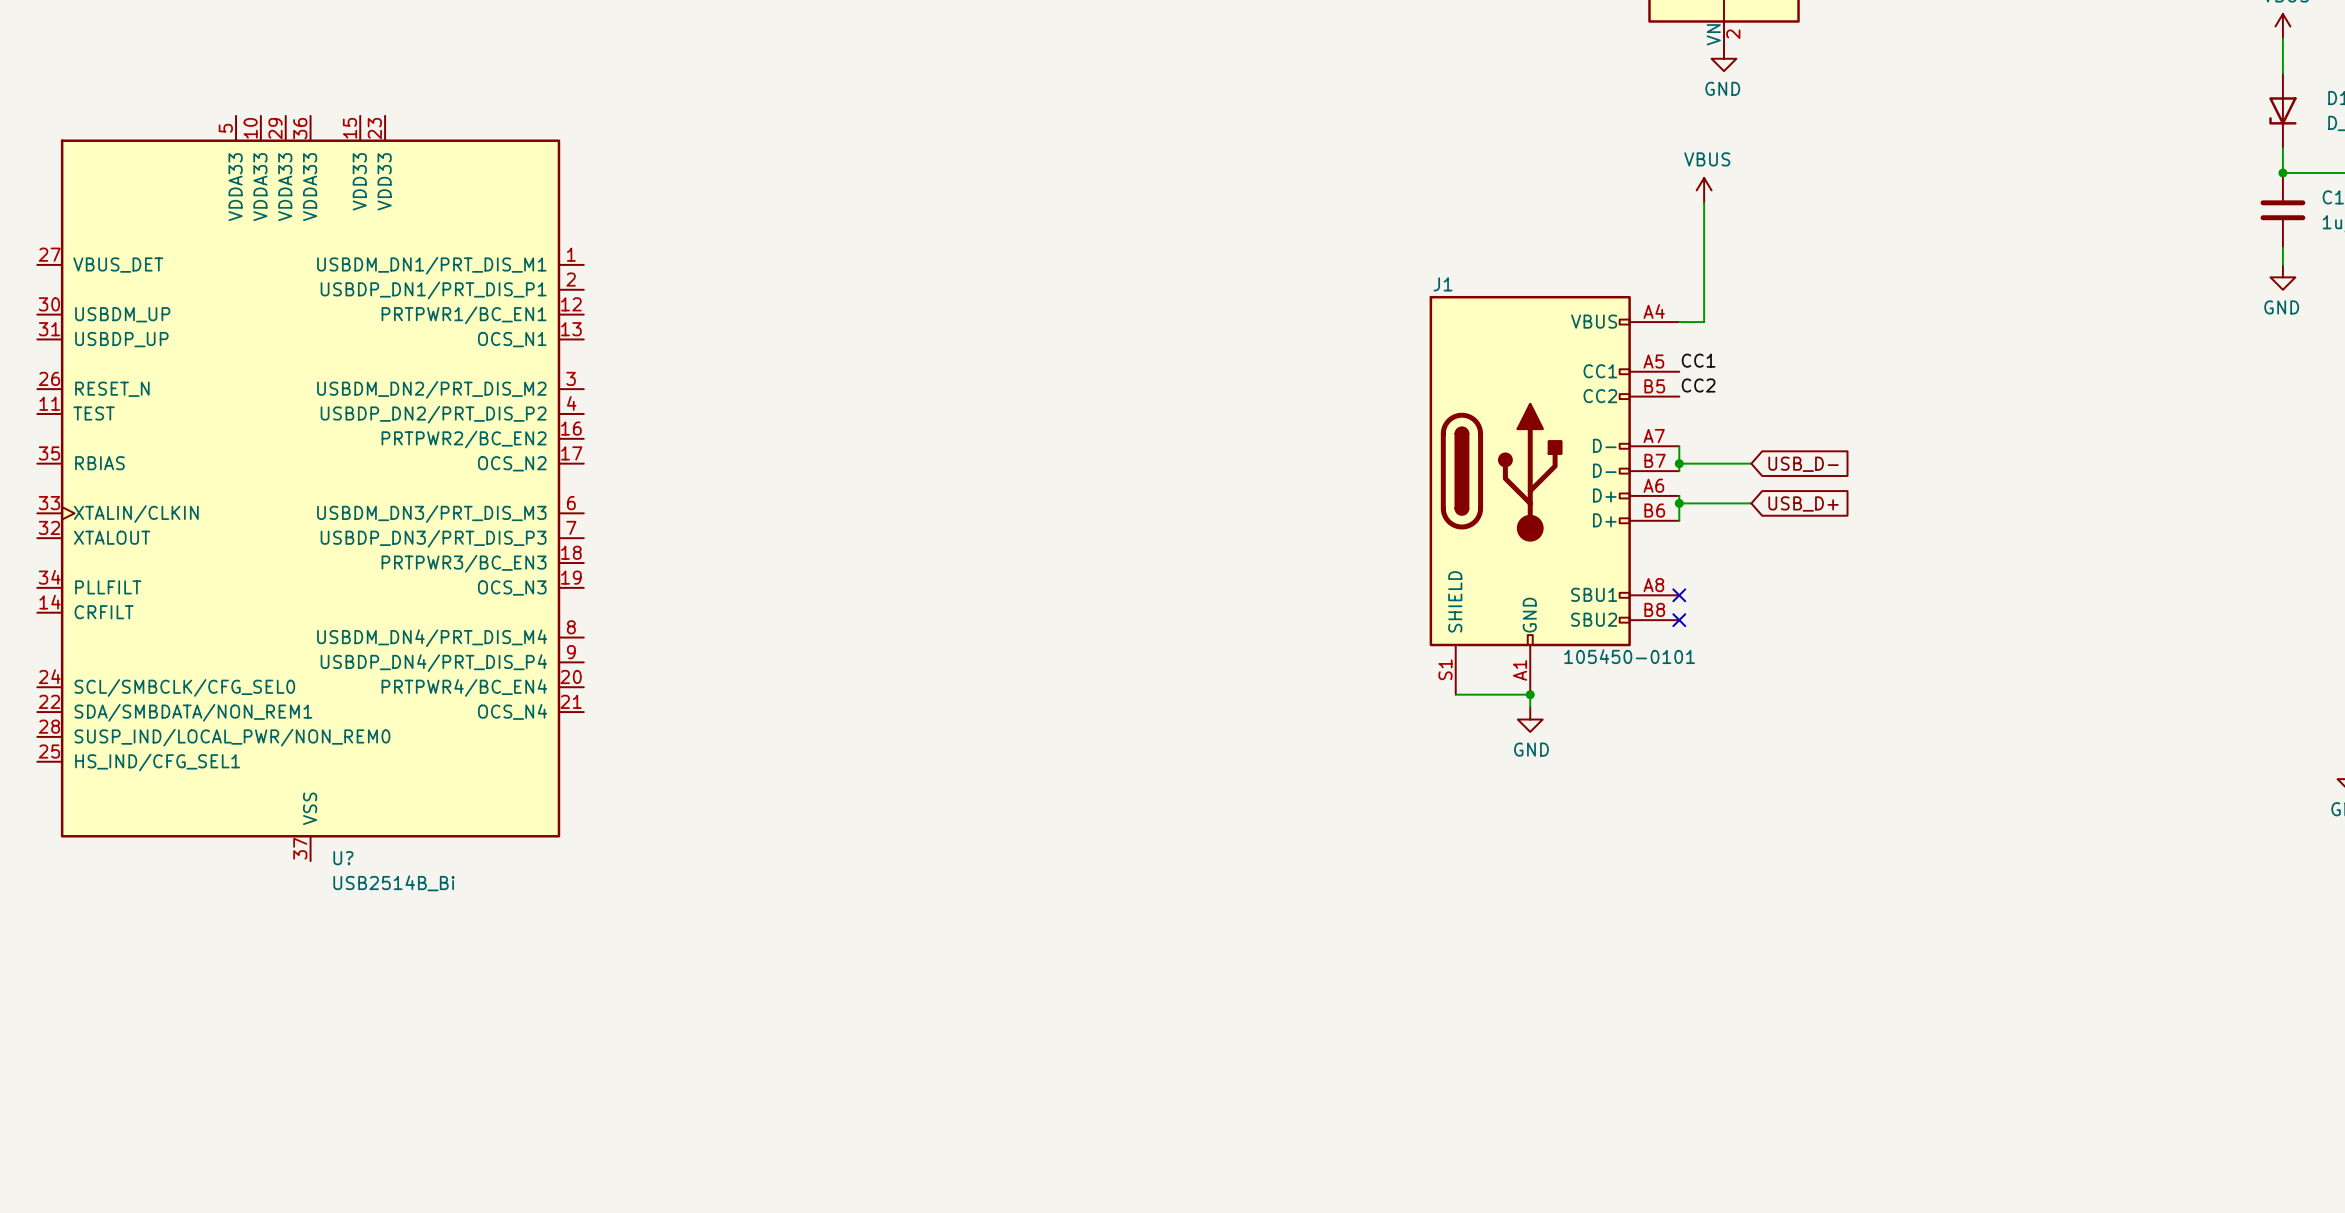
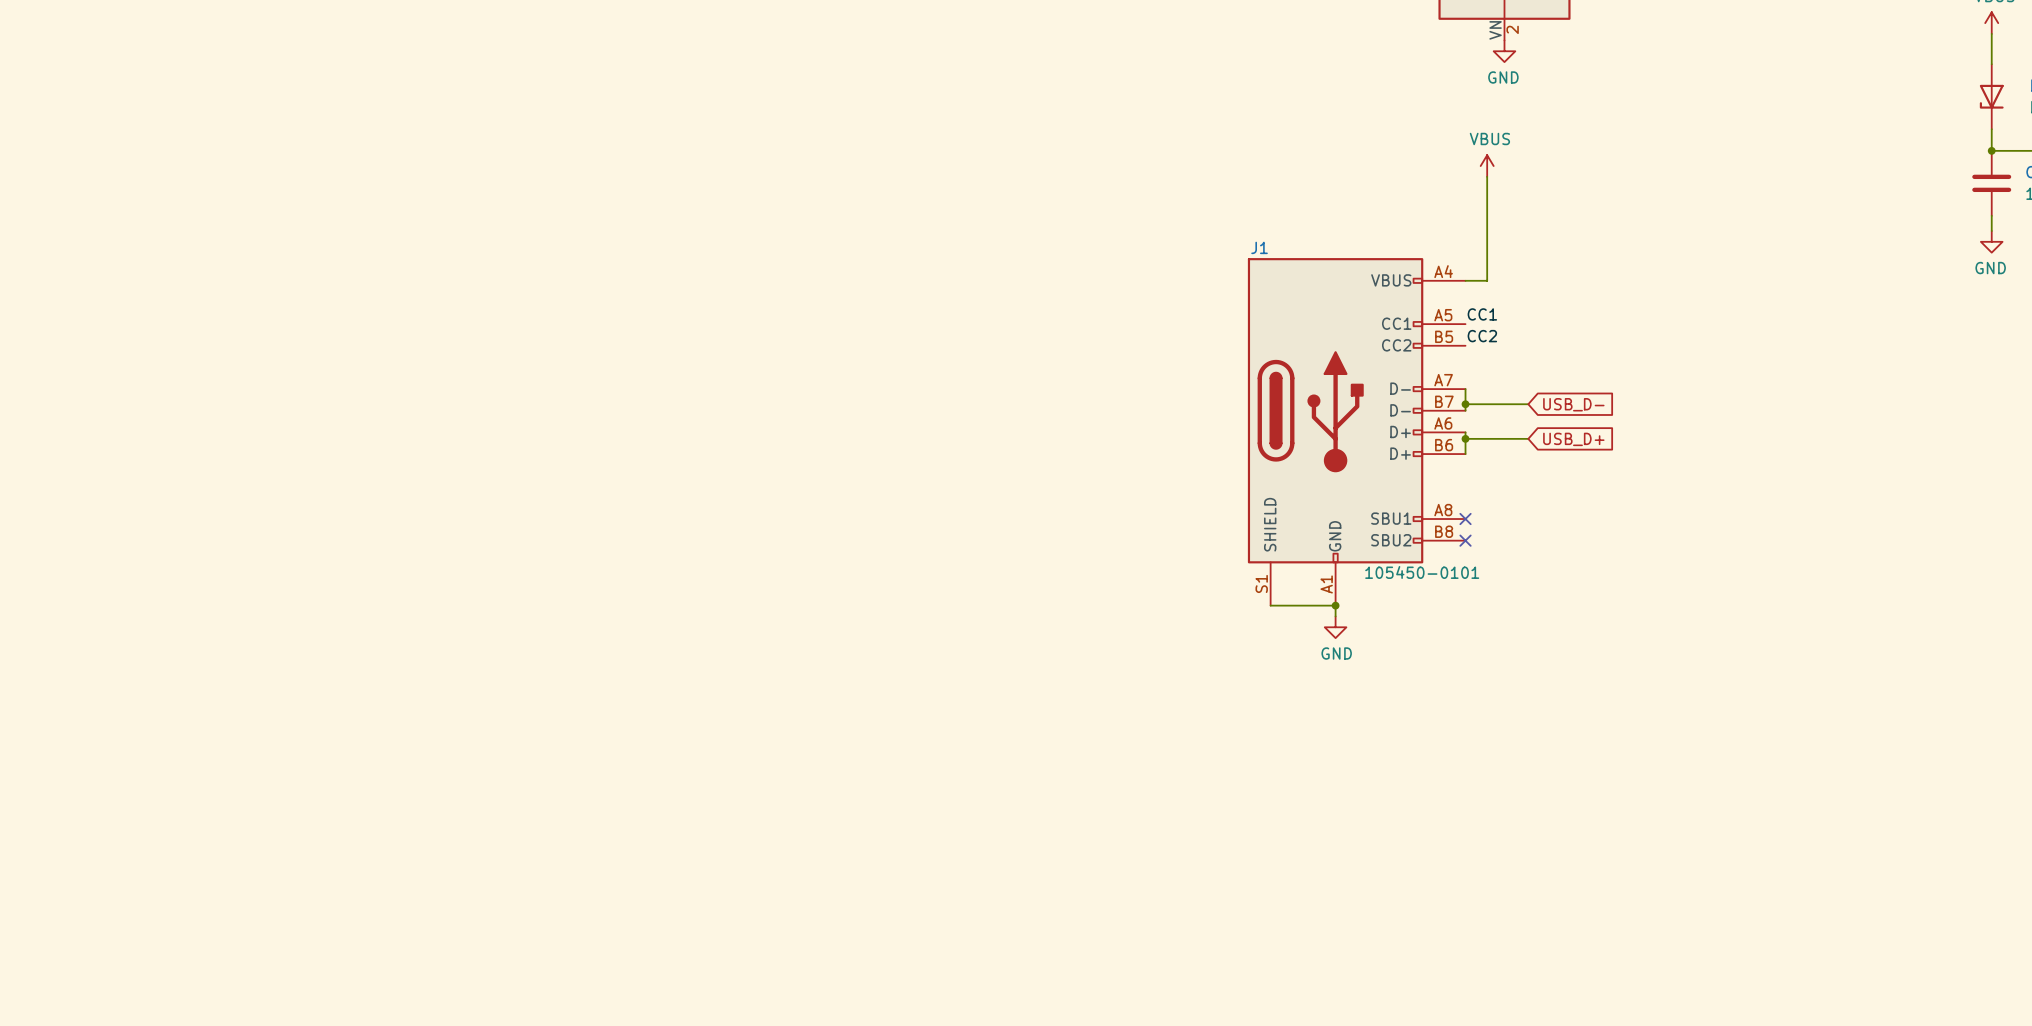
U?: USB2514B_Bi (310, 488) -> none

